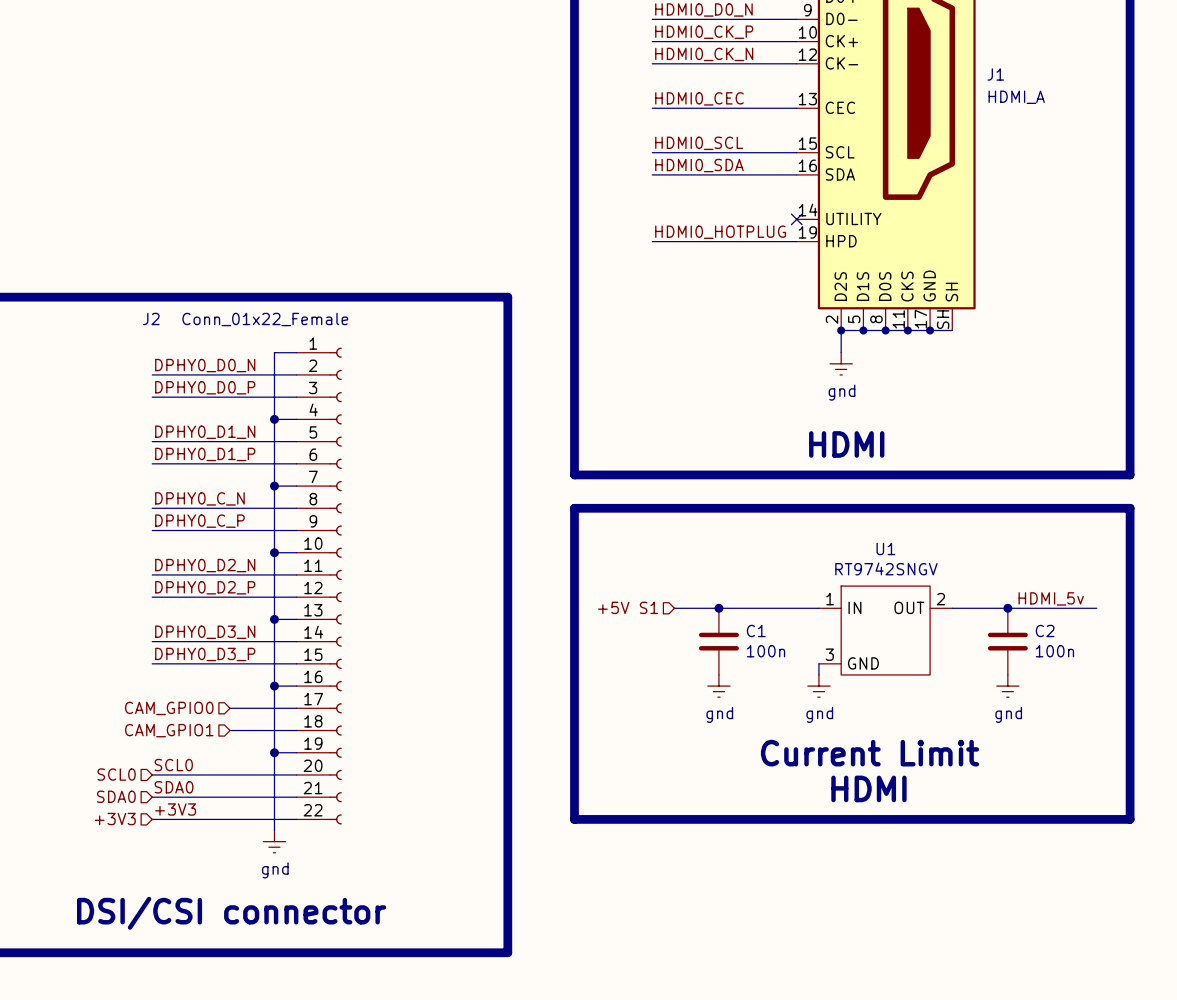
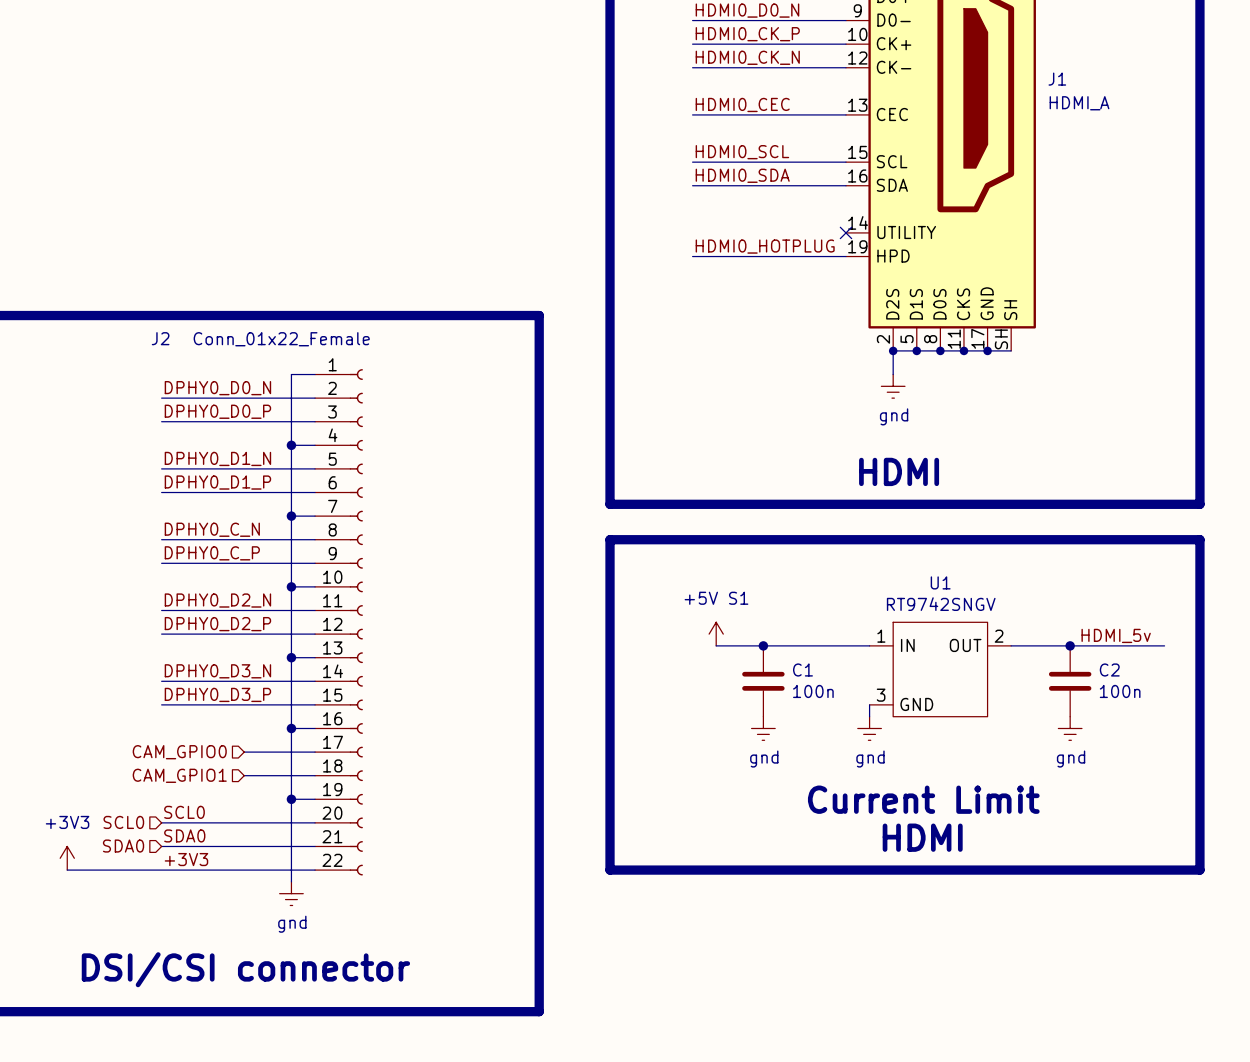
power symbol: none -> +5V S1 (716, 634)
hierarchical label: +5V S1 (628, 607) -> none
power symbol: none -> +3V3 (67, 858)
wire: none -> (67, 870) (161, 870)
hierarchical label: +3V3 (115, 819) -> none

